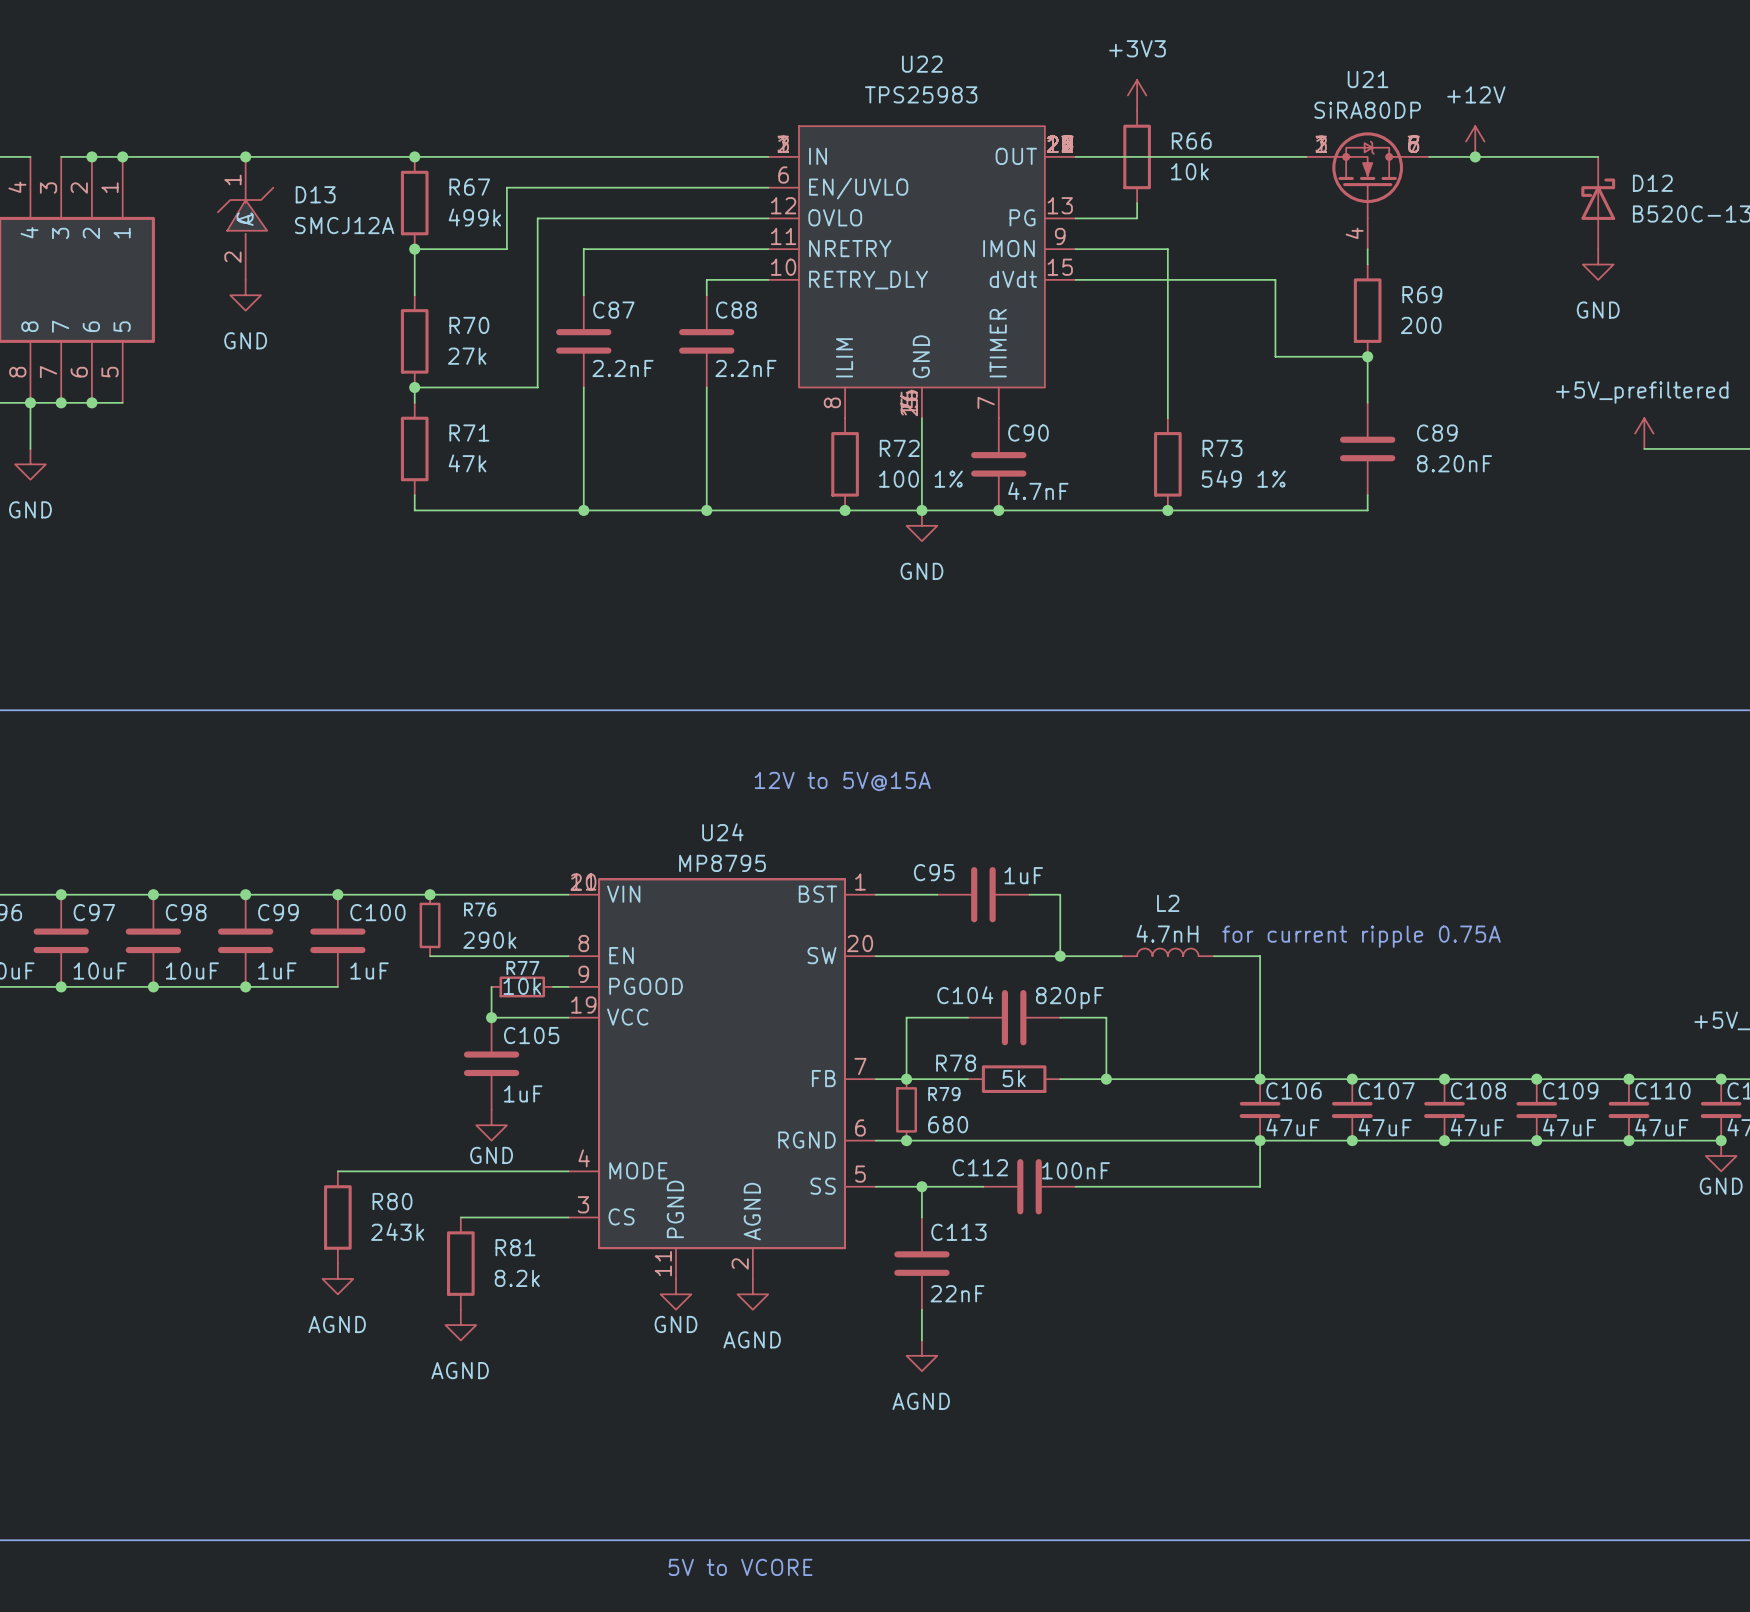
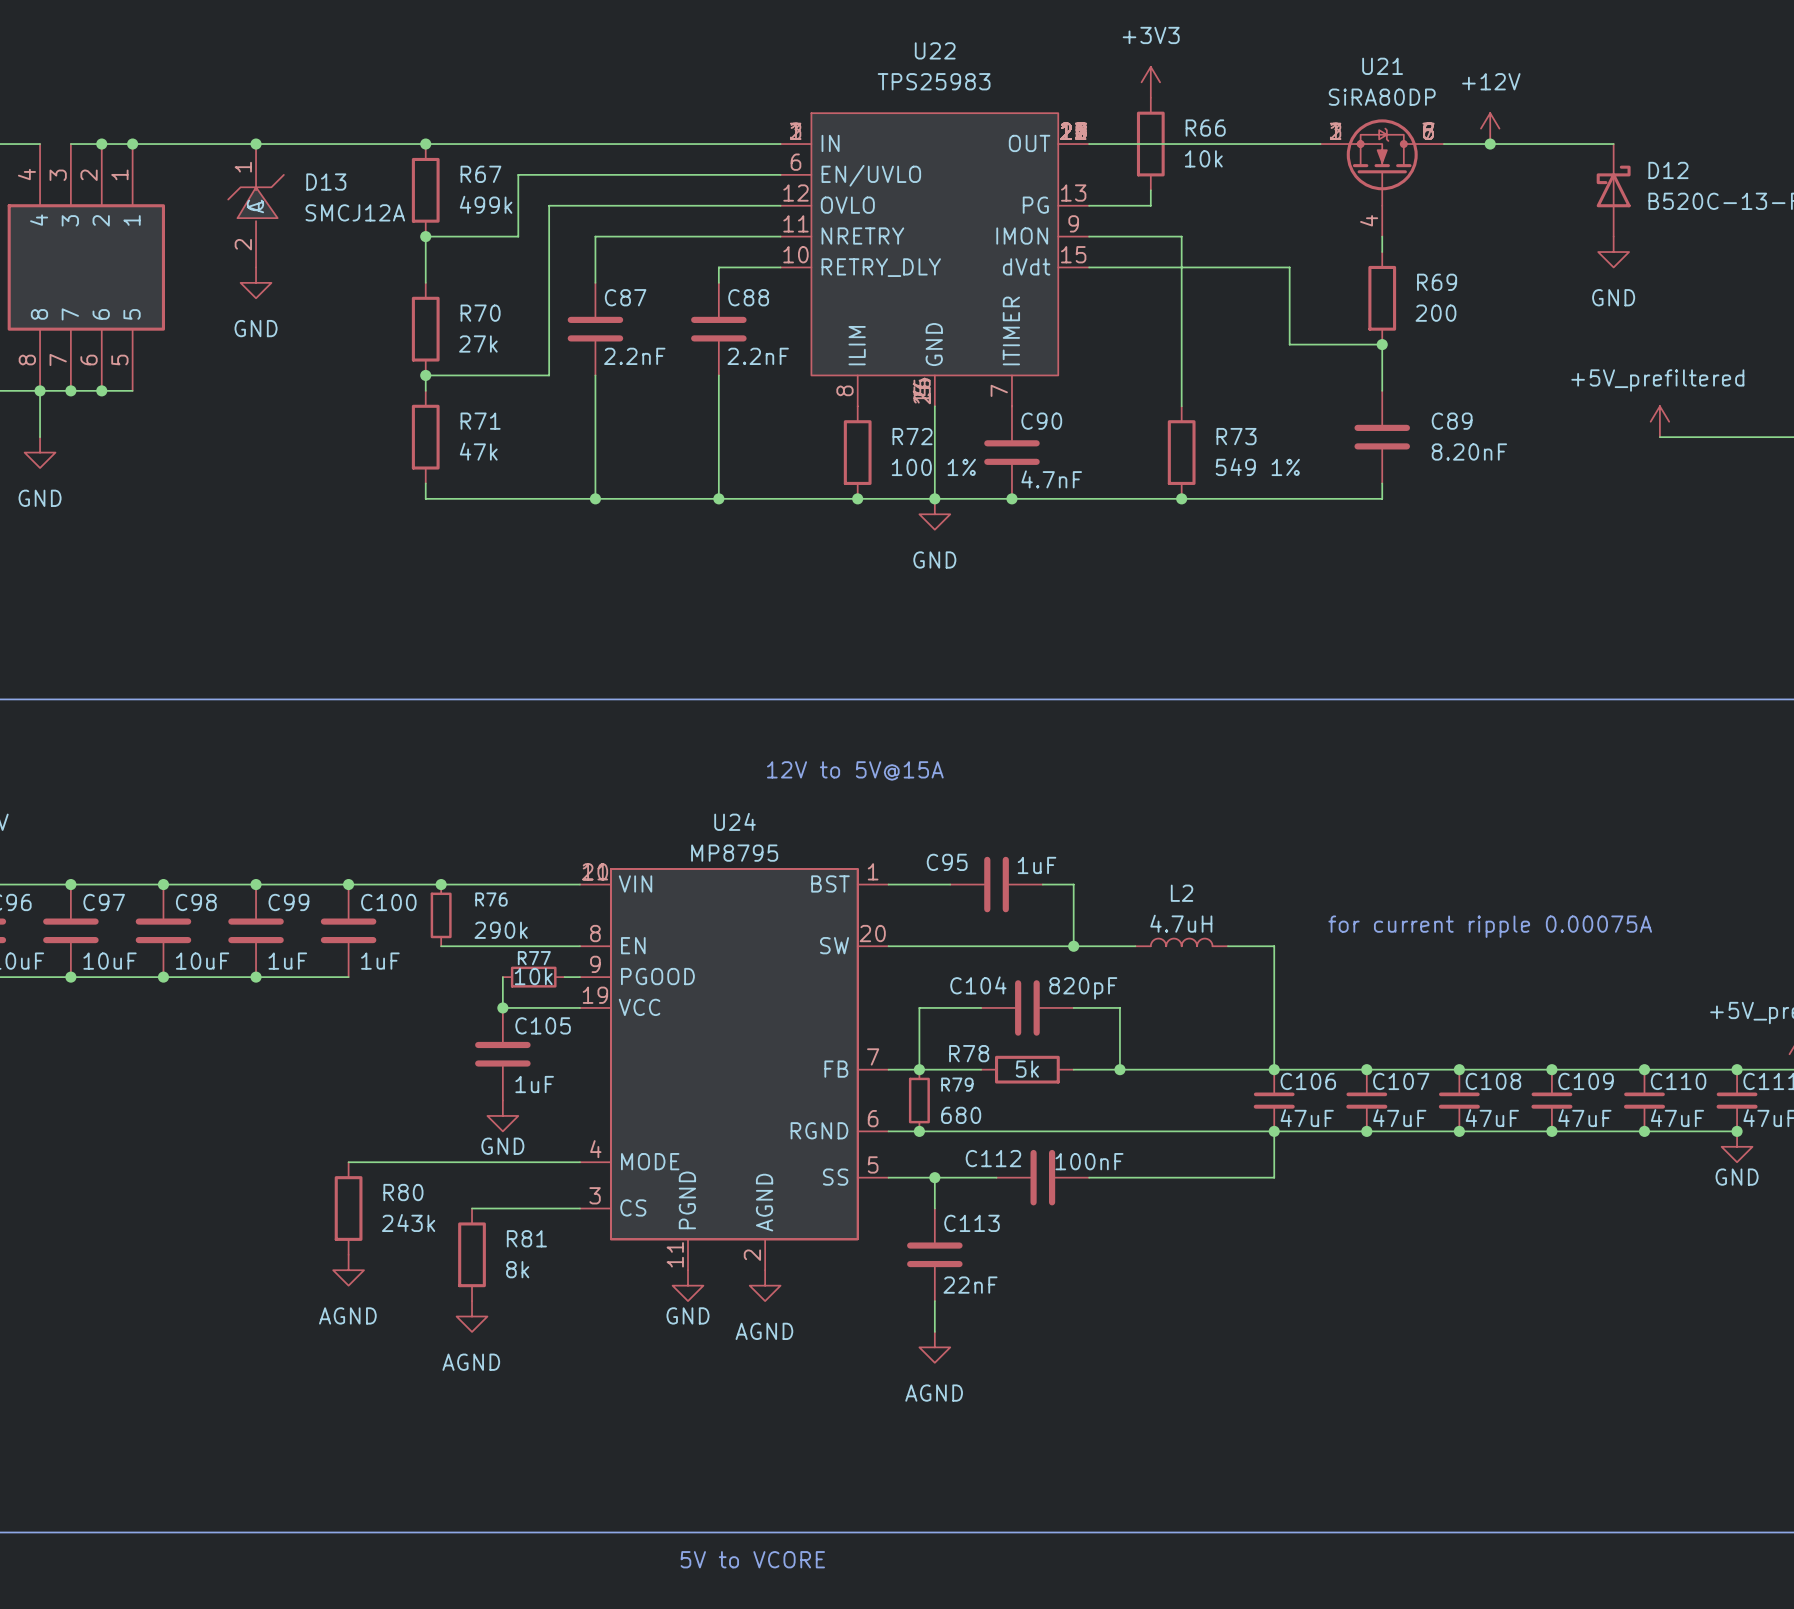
L2 value: 4.7nH (1167, 933) -> 4.7uH (1181, 923)
text: for current ripple 0.75A (1361, 936) -> for current ripple 0.00075A (1490, 926)
R81 value: 8.2k (517, 1278) -> 8k (517, 1269)

